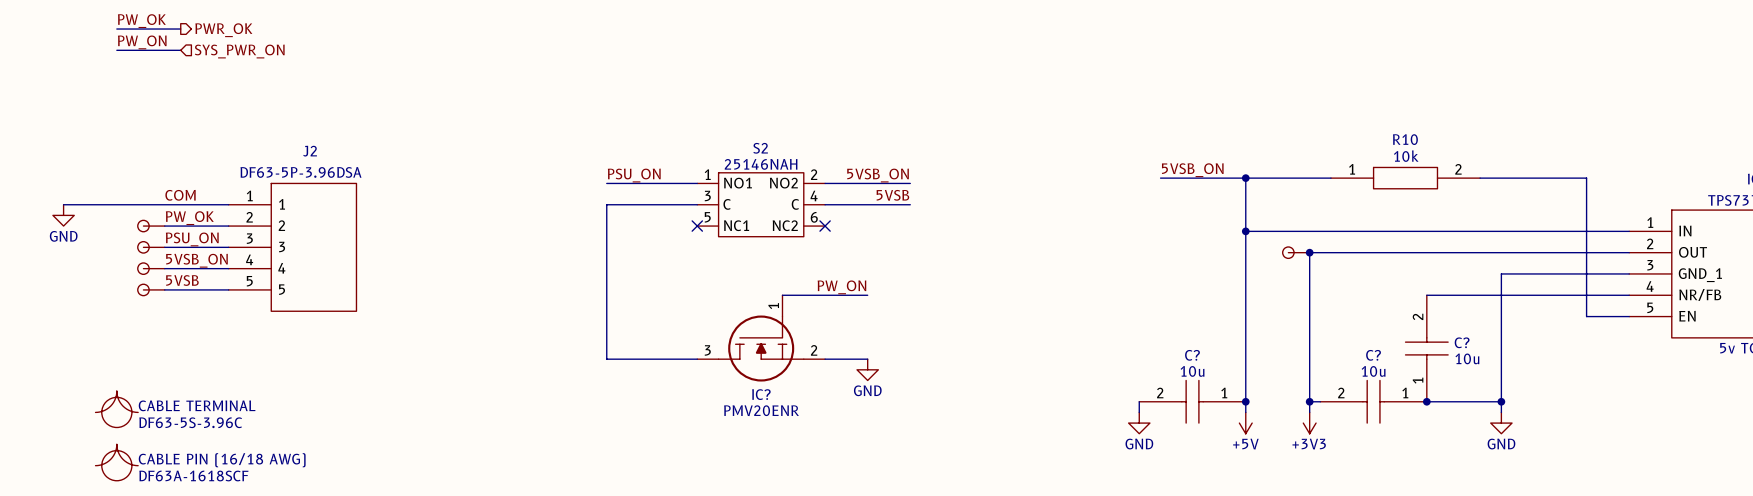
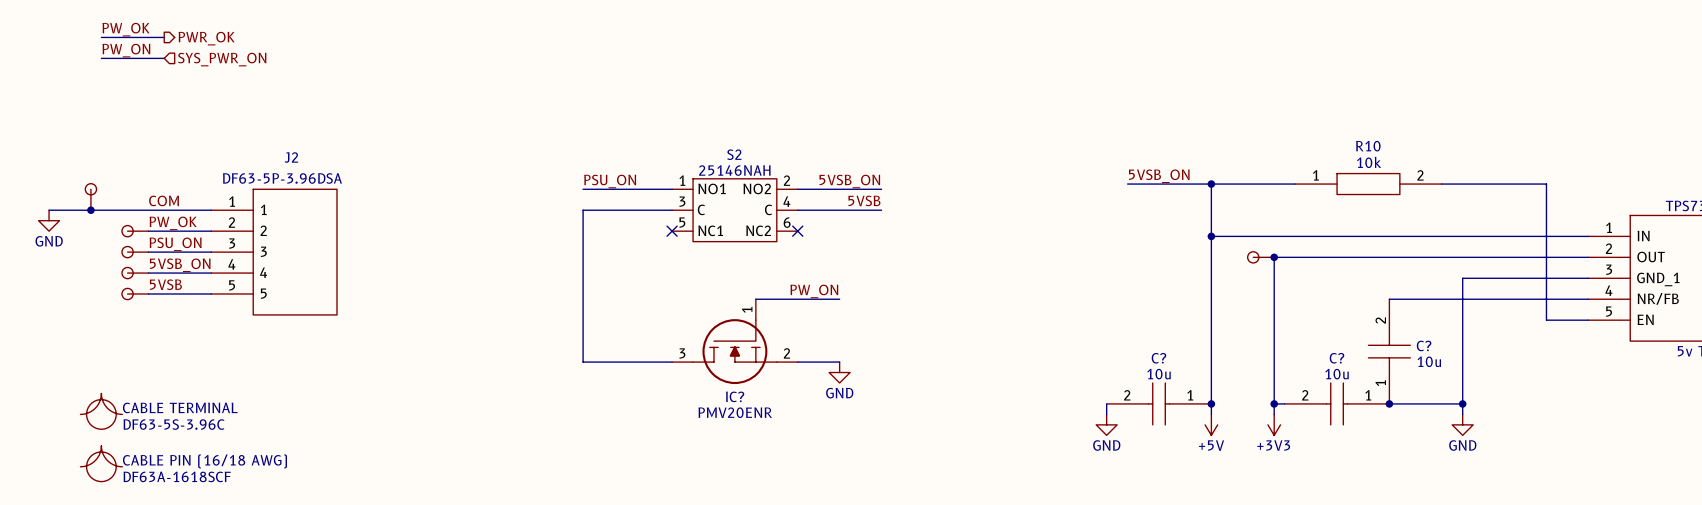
part: none -> (90, 196)
junction: none -> (90, 210)

